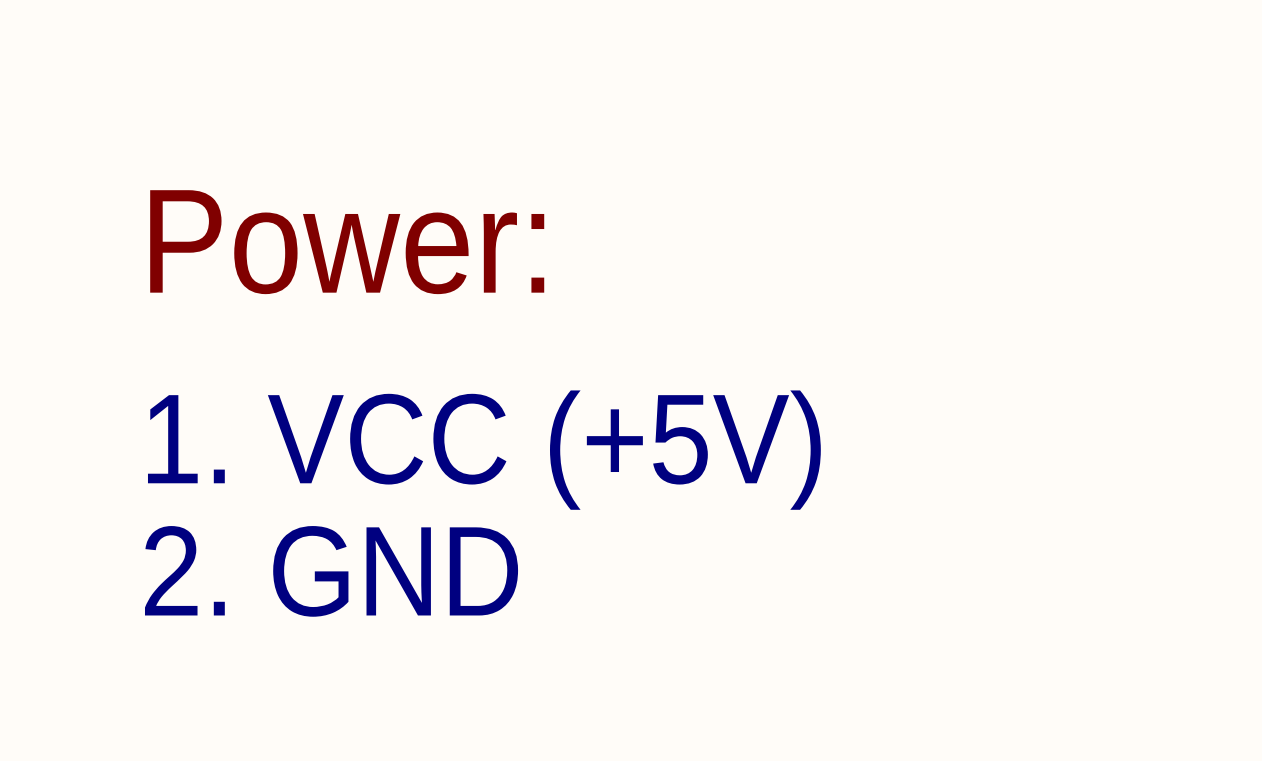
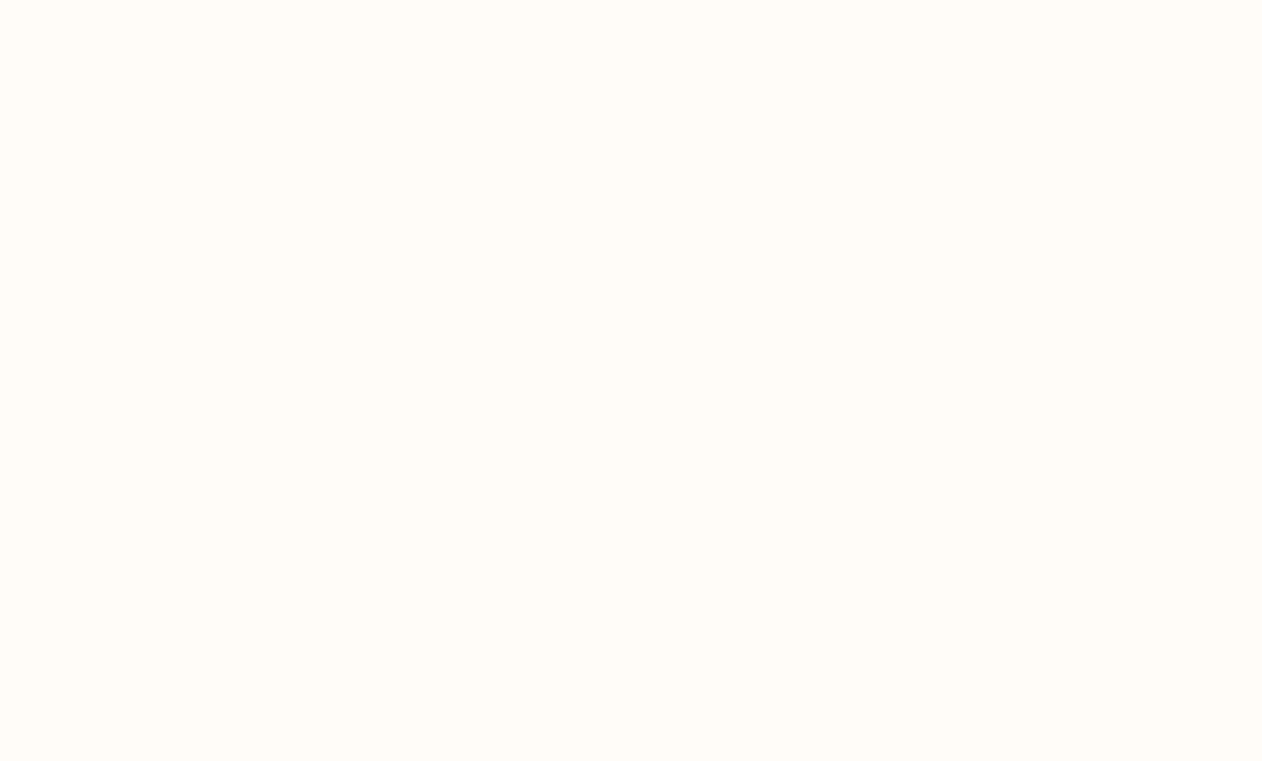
text: Power: (347, 242) -> none
text: 1. VCC (+5V) (484, 450) -> none
text: 2. GND (331, 571) -> none

